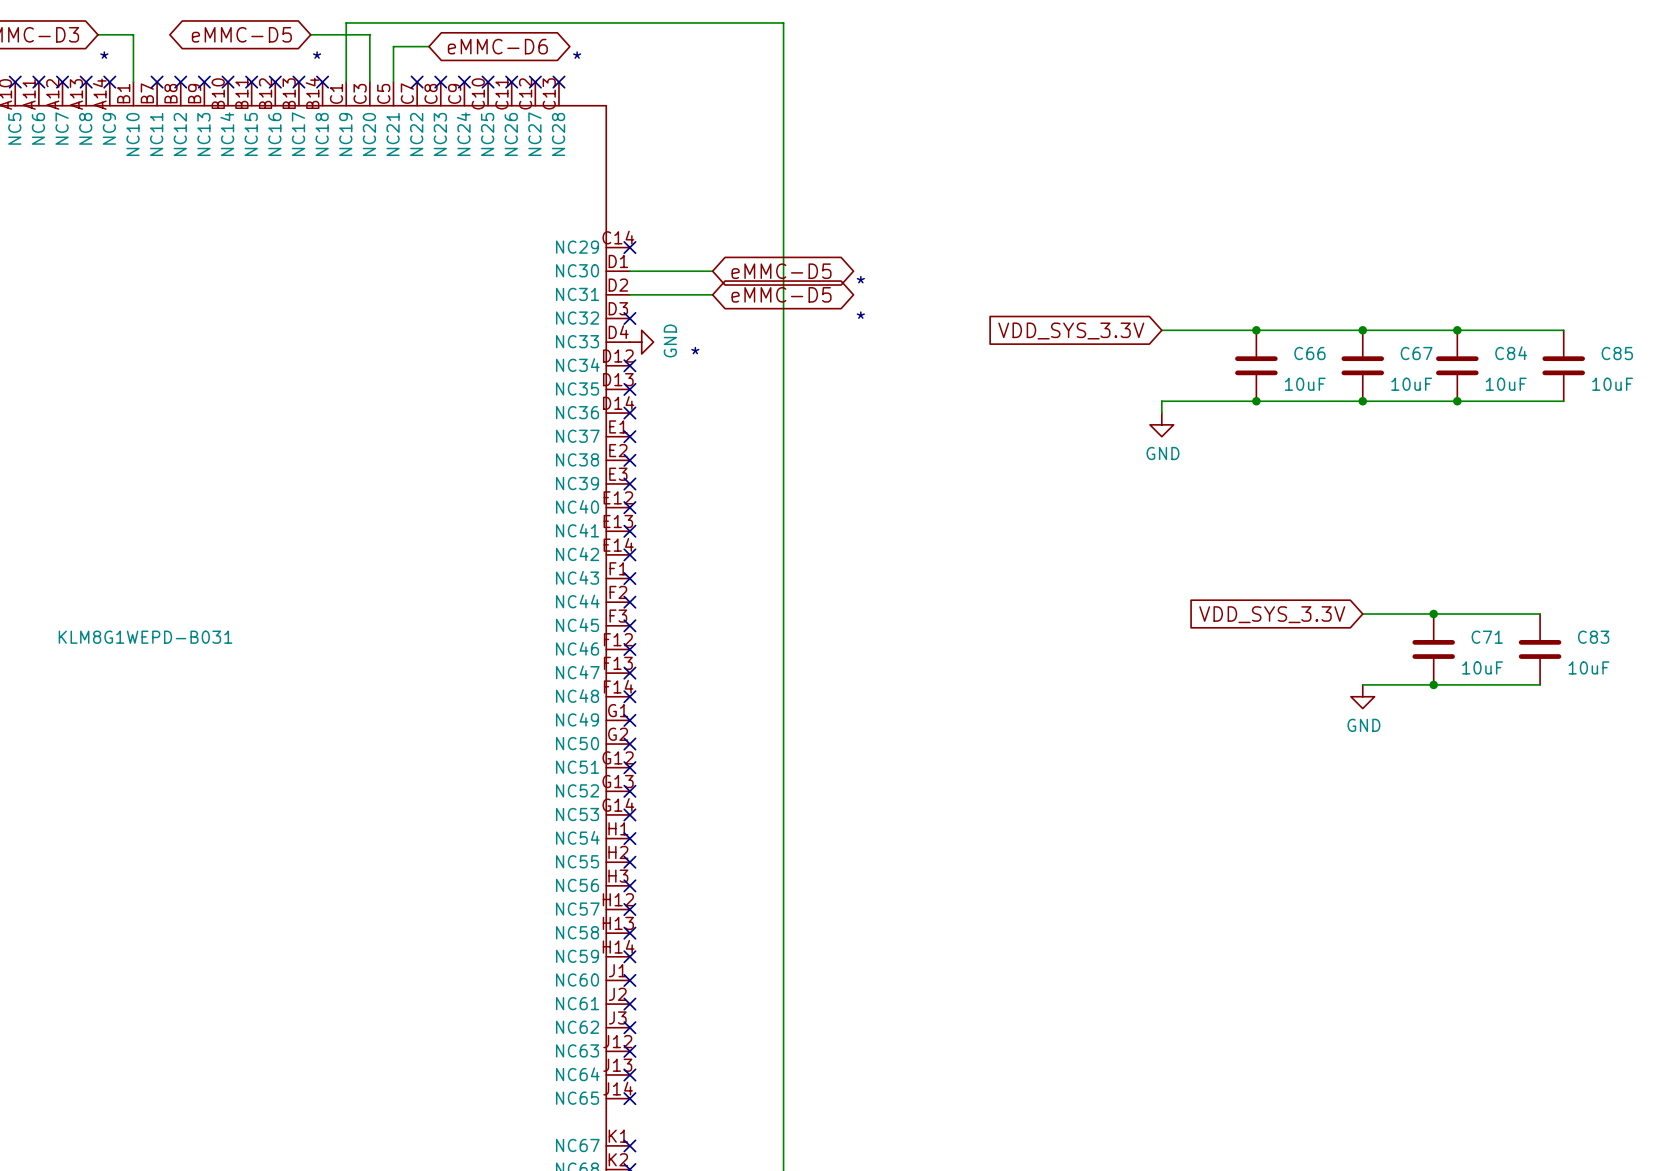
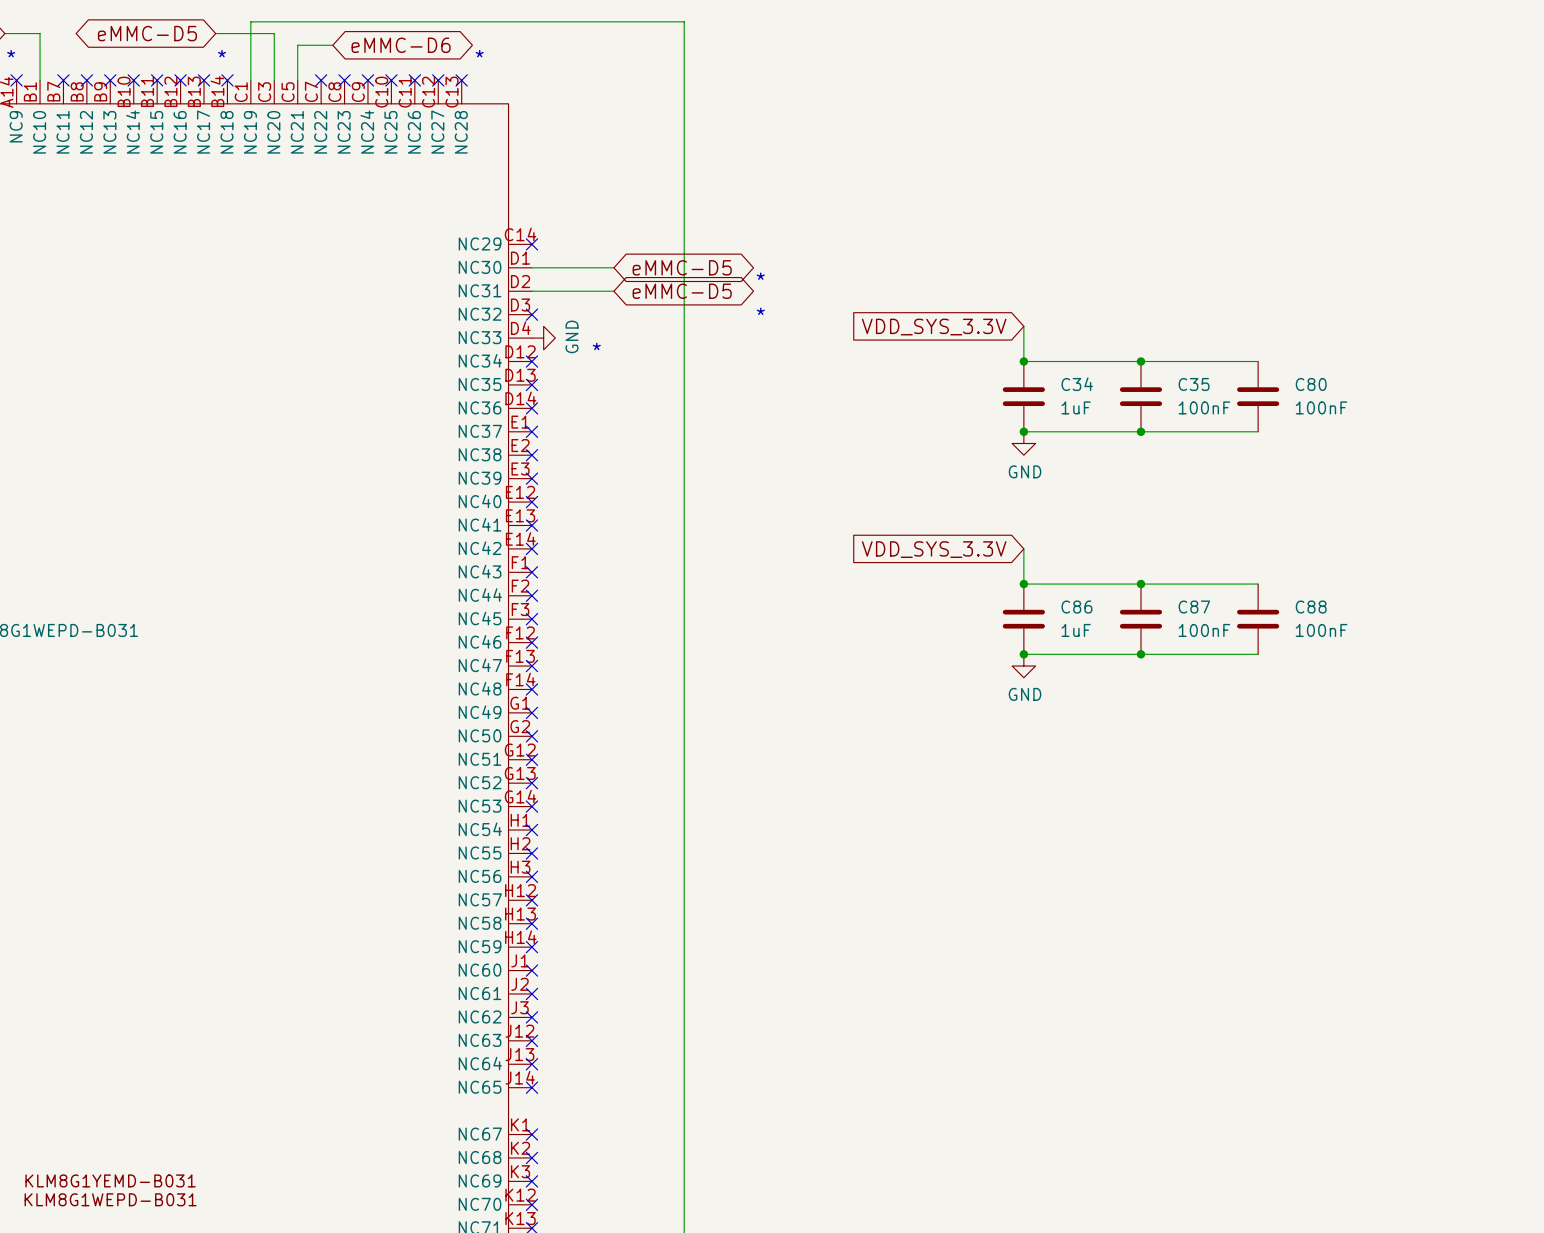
global label position: VDD_SYS_3.3V (1071, 330) -> VDD_SYS_3.3V (934, 327)
wire: none -> (1023, 326) (1023, 361) (1258, 361)
wire: (1161, 330) (1563, 330) -> none
junction: (1256, 330) -> none
junction: (1362, 330) -> none
junction: (1457, 330) -> none
junction: none -> (1023, 361)
junction: none -> (1140, 361)
C66: 10uF (1256, 365) -> none
C67: 10uF (1362, 365) -> none
C84: 10uF (1457, 365) -> none
C85: 10uF (1563, 365) -> none
C34: none -> 1uF (1023, 396)
C35: none -> 100nF (1140, 396)
junction: (1256, 401) -> none
junction: (1362, 401) -> none
C80: none -> 100nF (1258, 396)
junction: (1457, 401) -> none
wire: (1563, 401) (1161, 401) (1161, 413) -> none
power symbol position: GND (1161, 424) -> GND (1023, 443)
wire: none -> (1023, 431) (1258, 431)
junction: none -> (1023, 431)
junction: none -> (1140, 431)
wire: none -> (1023, 548) (1023, 584) (1258, 584)
global label: none -> VDD_SYS_3.3V (934, 549)
junction: none -> (1023, 584)
junction: none -> (1140, 584)
global label: VDD_SYS_3.3V (1272, 614) -> none
wire: (1362, 614) (1540, 614) -> none
junction: (1433, 614) -> none
C86: none -> 1uF (1023, 619)
C87: none -> 100nF (1140, 619)
C88: none -> 100nF (1258, 619)
C71: 10uF (1433, 649) -> none
C83: 10uF (1540, 649) -> none
wire: none -> (1023, 654) (1258, 654)
junction: none -> (1023, 654)
junction: none -> (1140, 654)
power symbol: none -> GND (1023, 666)
wire: (1362, 684) (1540, 684) -> none
junction: (1433, 684) -> none
power symbol: GND (1362, 696) -> none

